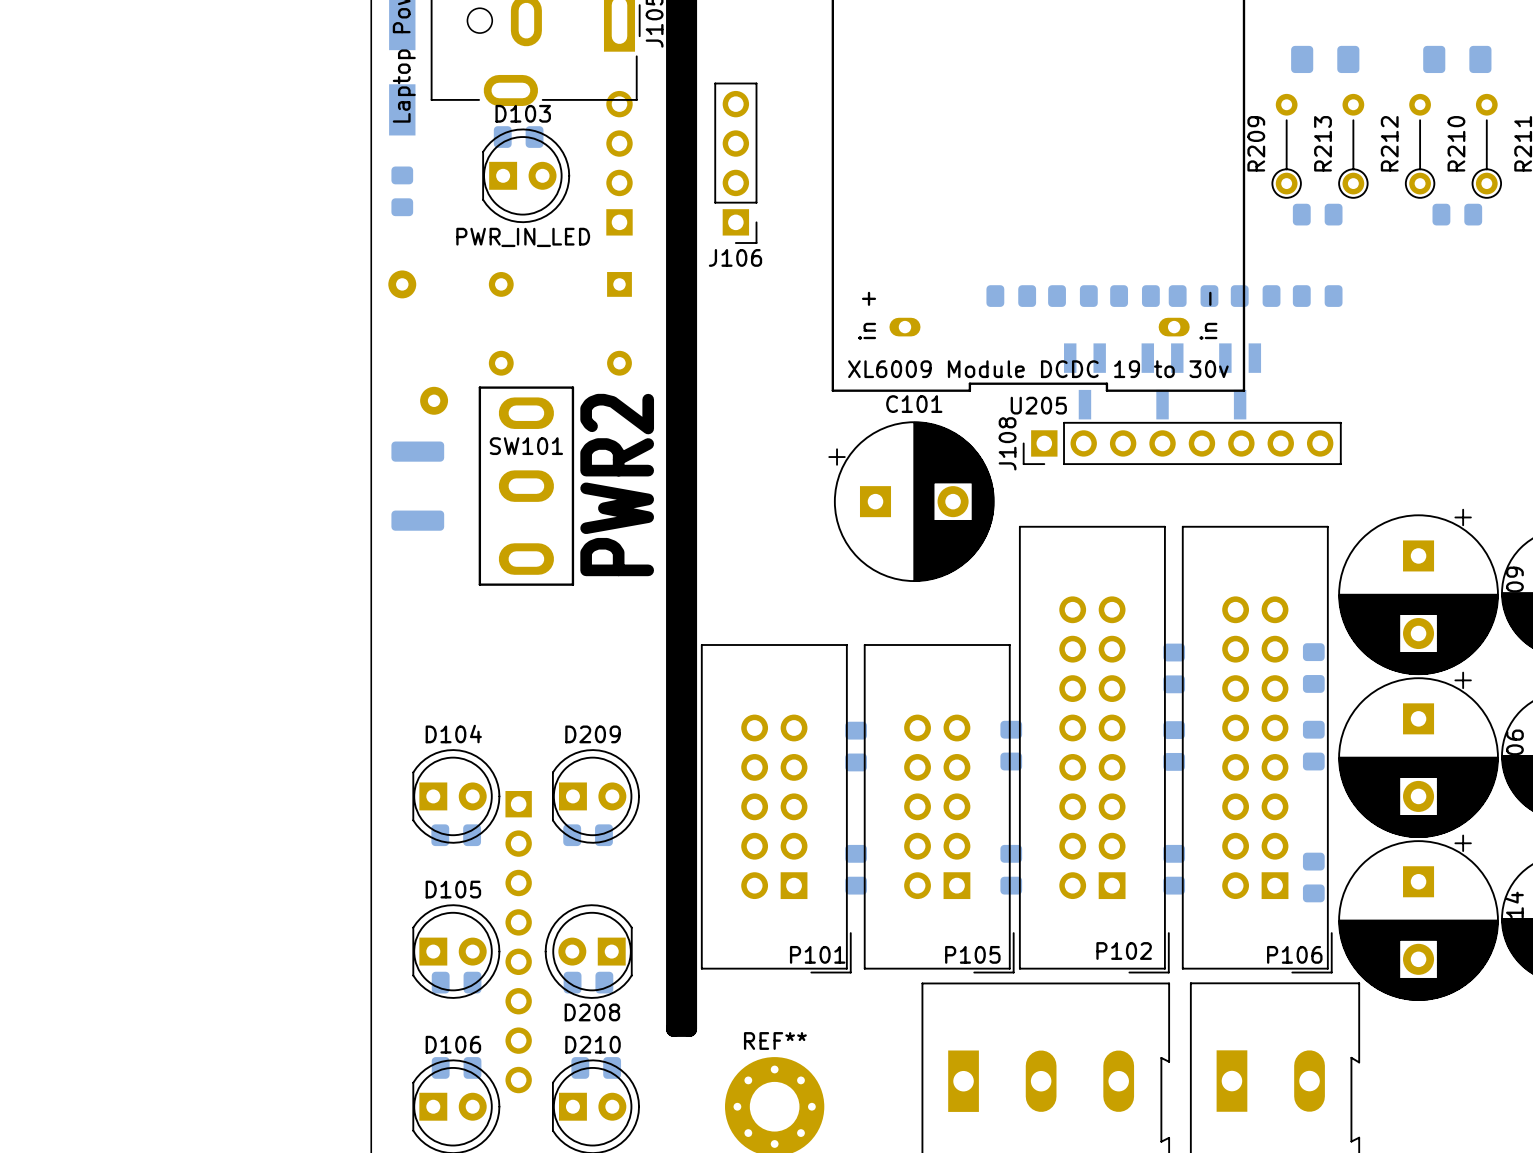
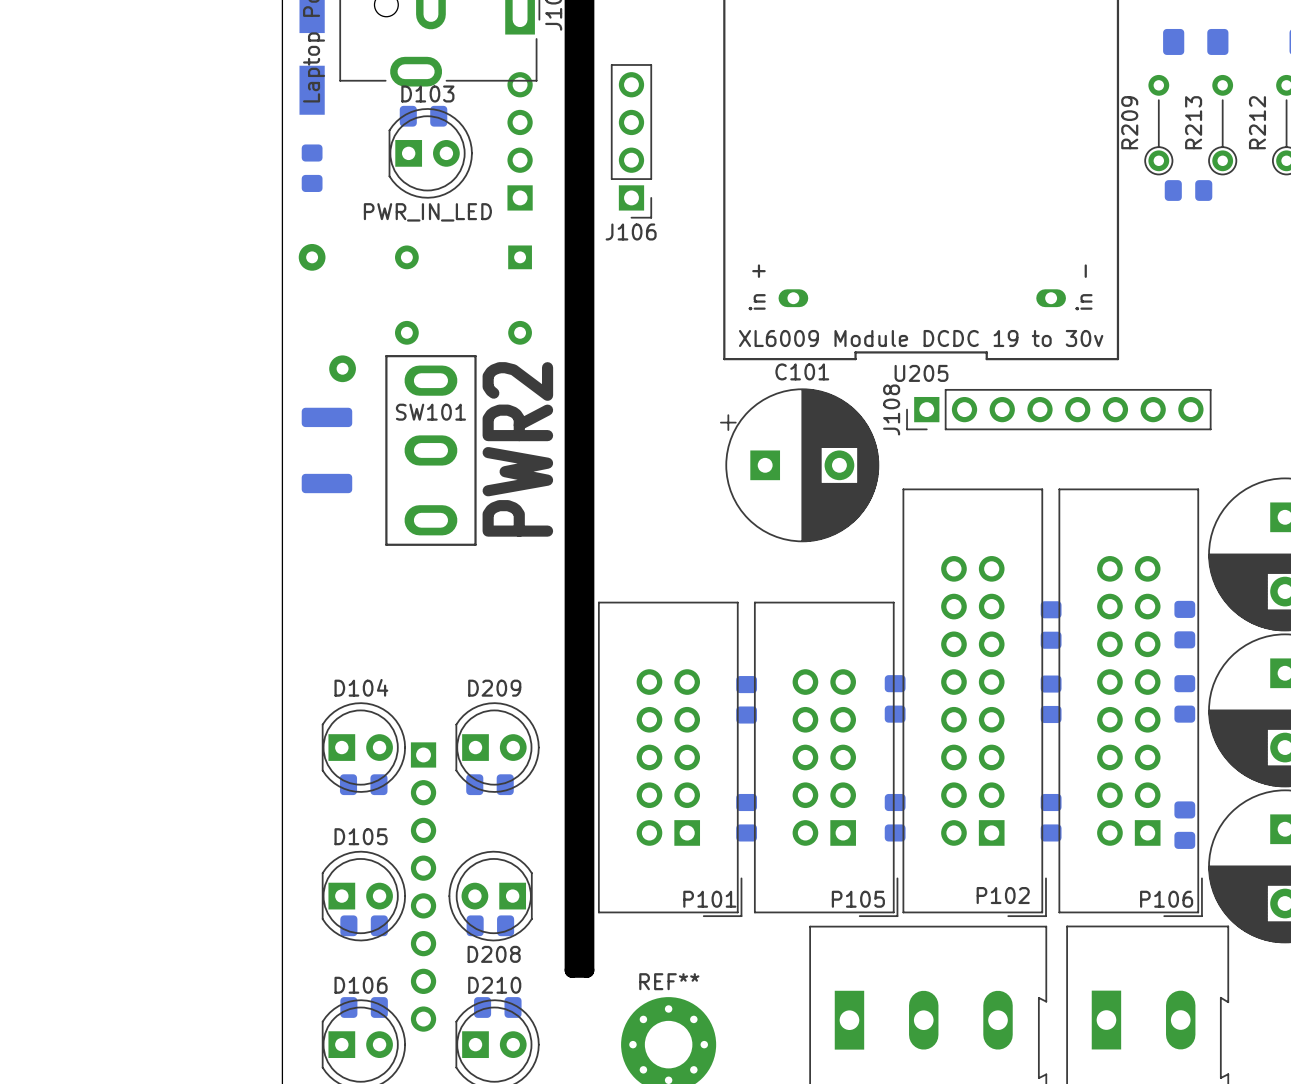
part: (1011, 296) -> none
part: (1072, 296) -> none
part: (1134, 296) -> none
part: (1193, 296) -> none
part: (1255, 296) -> none
part: (1317, 296) -> none
part: (1084, 381) -> none
part: (1162, 381) -> none
part: (1240, 381) -> none

